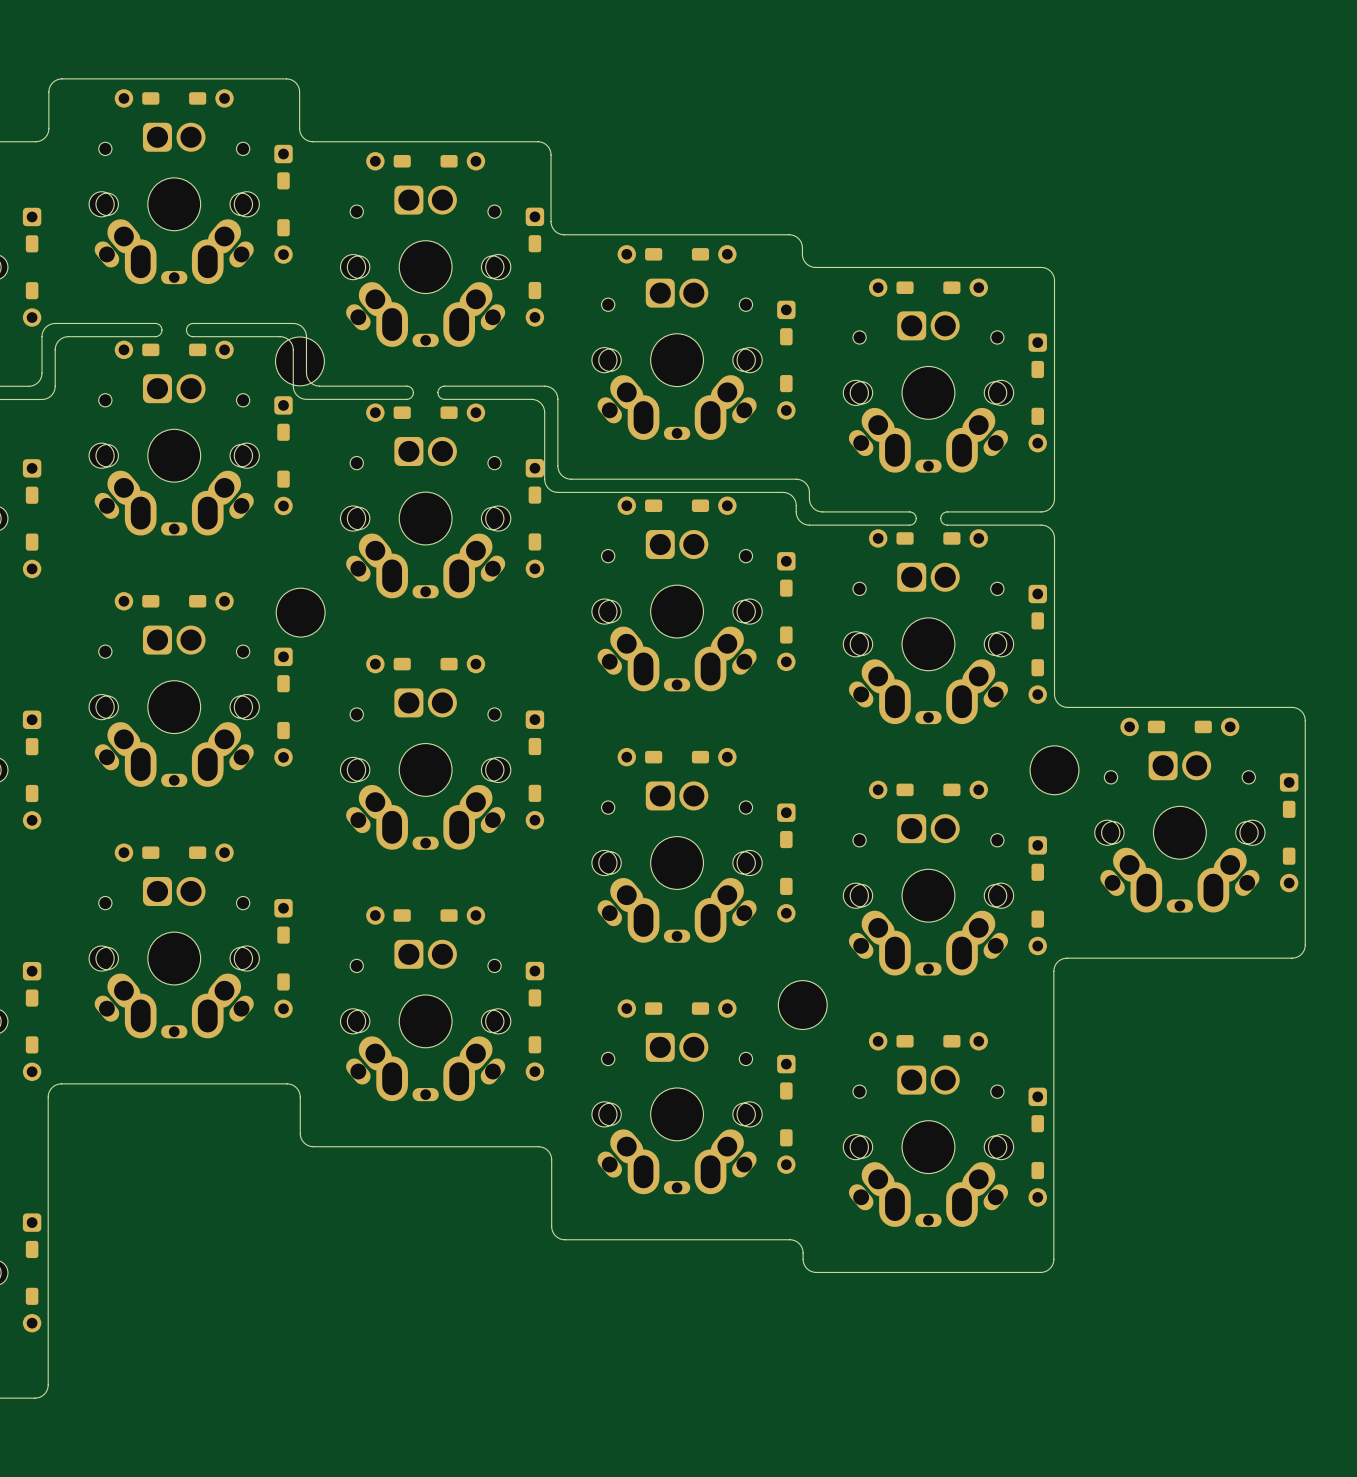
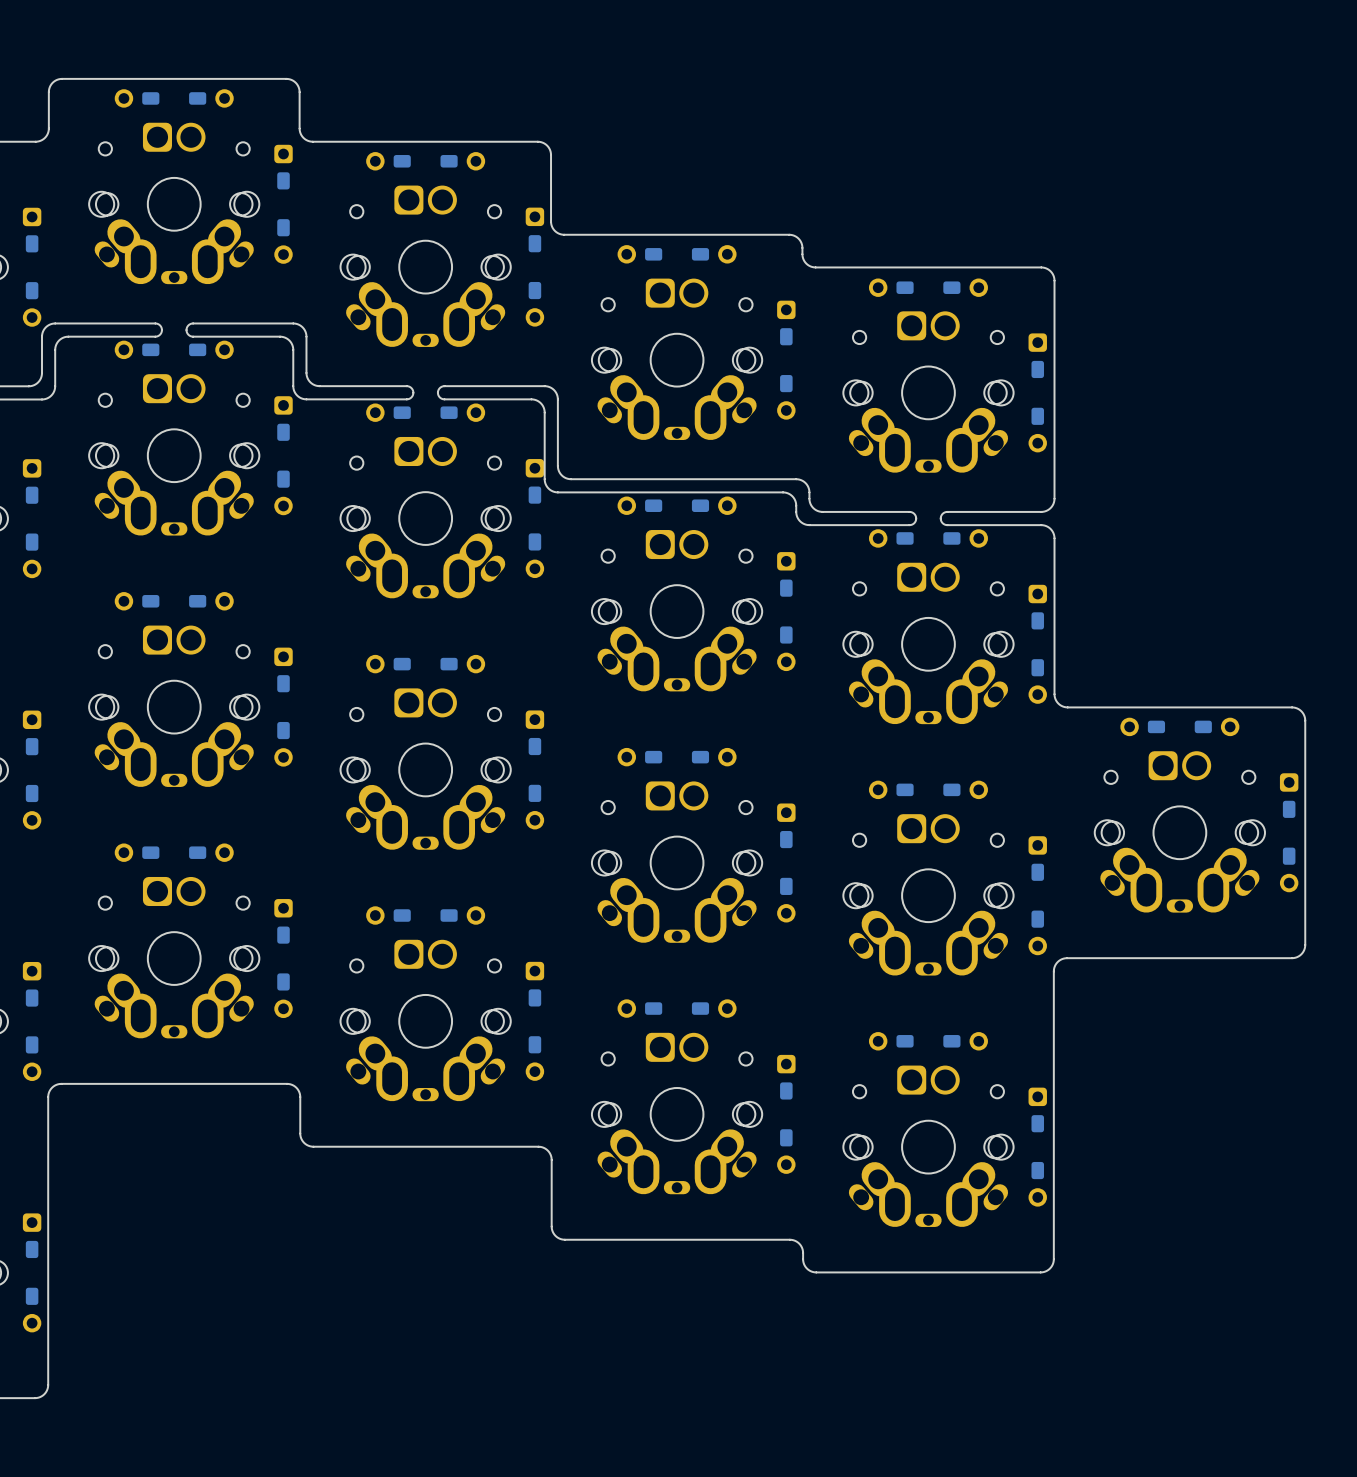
part: (299, 361) -> none
part: (300, 612) -> none
part: (1054, 770) -> none
part: (802, 1005) -> none

